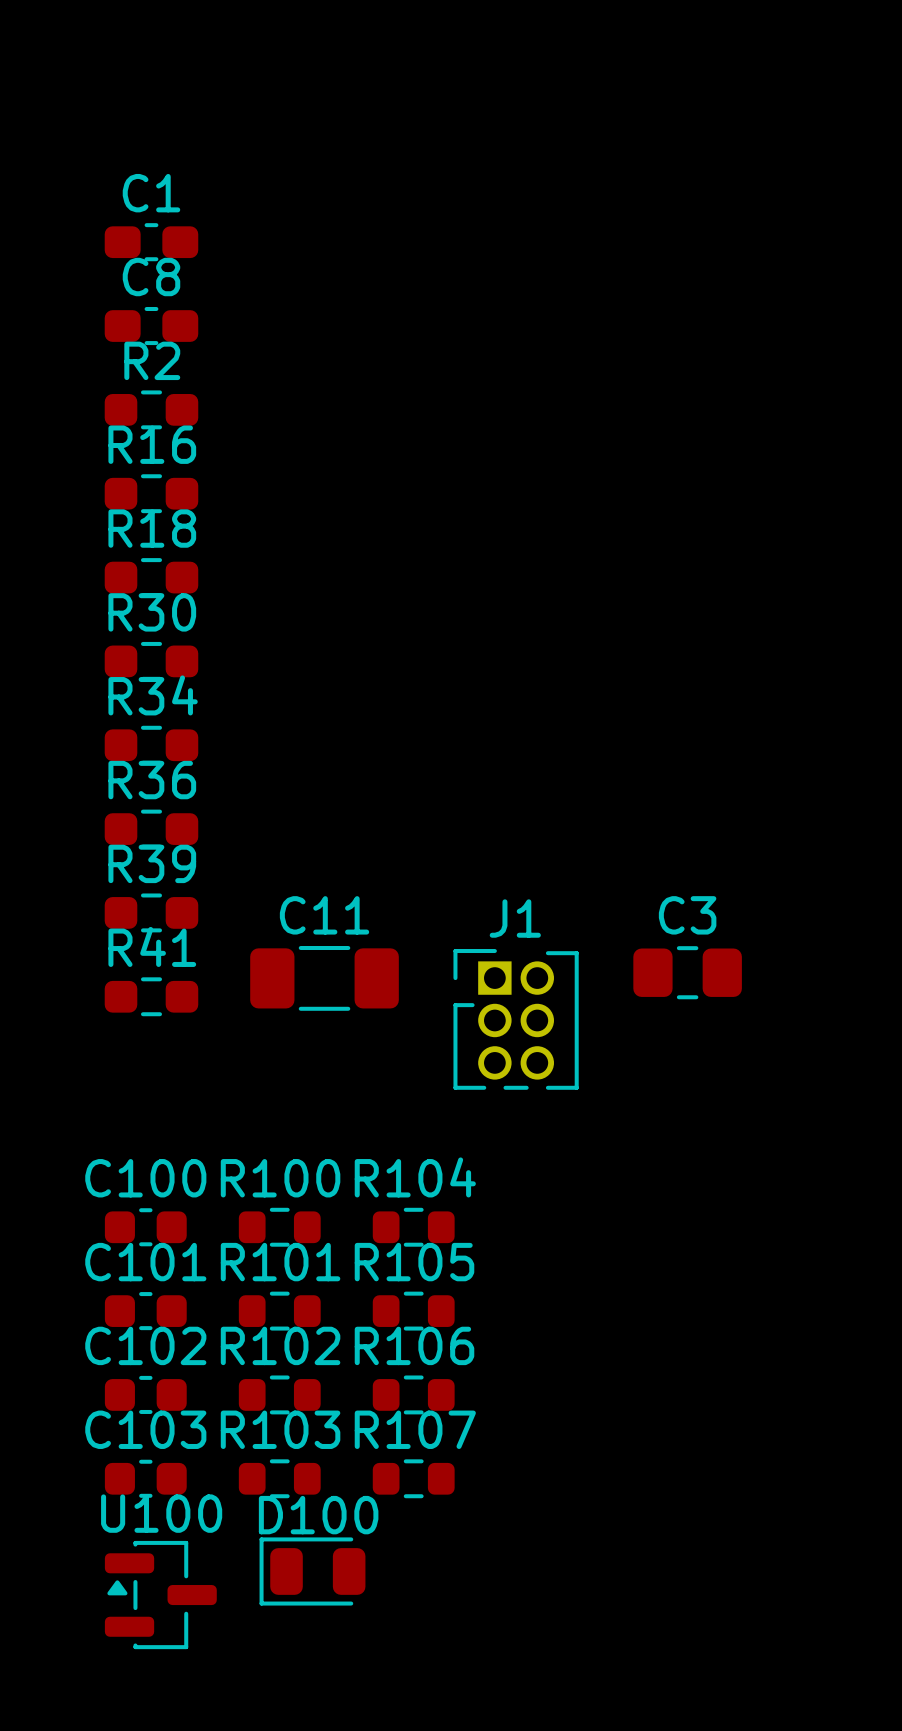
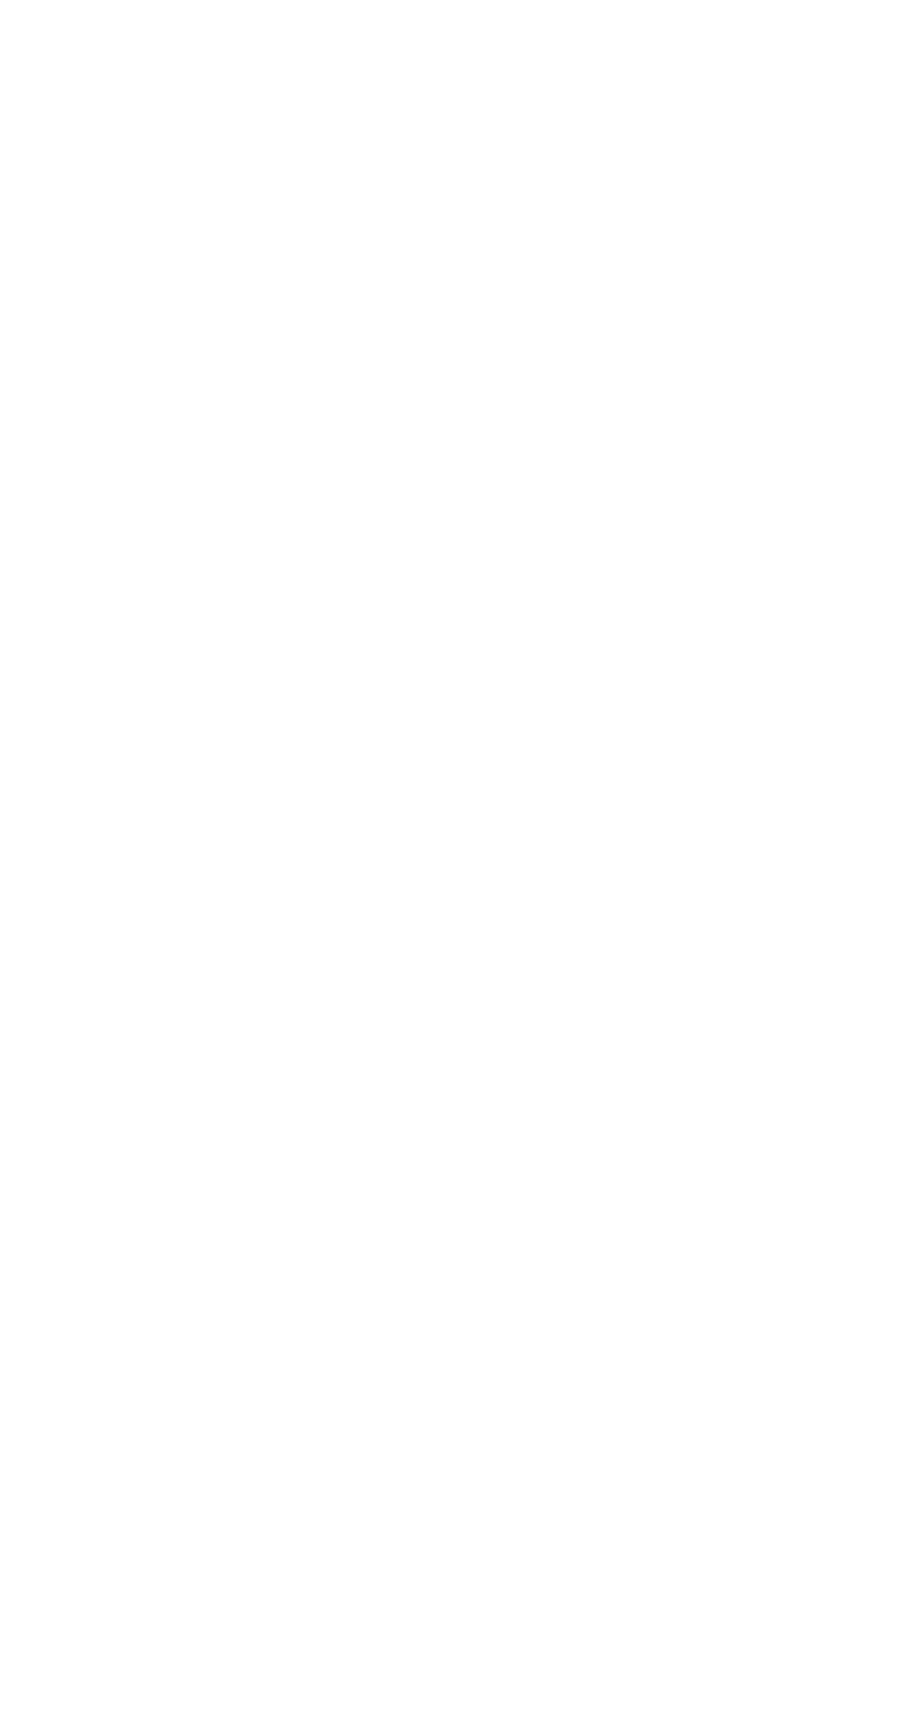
C1: (151, 242) -> none
C8: (151, 326) -> none
R2: (151, 409) -> none
R16: (151, 493) -> none
R18: (151, 577) -> none
R30: (151, 661) -> none
R34: (151, 745) -> none
R36: (151, 829) -> none
R39: (151, 912) -> none
C3: (687, 972) -> none
C11: (324, 978) -> none
R41: (151, 996) -> none
J1: (516, 1019) -> none
C100: (145, 1227) -> none
R100: (279, 1227) -> none
R104: (413, 1227) -> none
C101: (145, 1311) -> none
R101: (279, 1311) -> none
R105: (413, 1311) -> none
C102: (145, 1394) -> none
R102: (279, 1394) -> none
R106: (413, 1394) -> none
C103: (145, 1478) -> none
R103: (279, 1478) -> none
R107: (413, 1478) -> none
D100: (312, 1571) -> none
U100: (160, 1595) -> none

